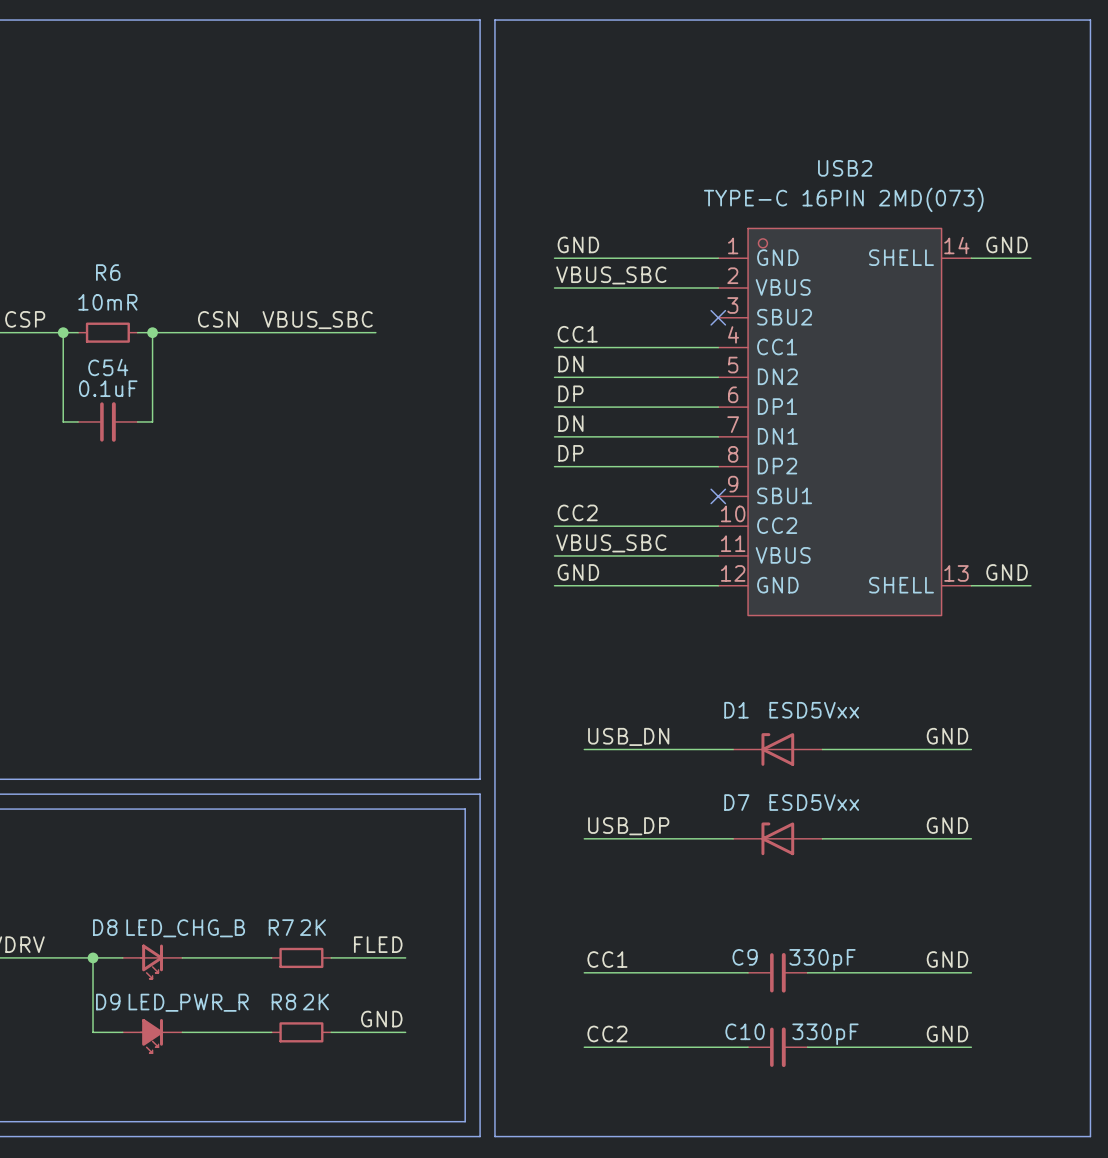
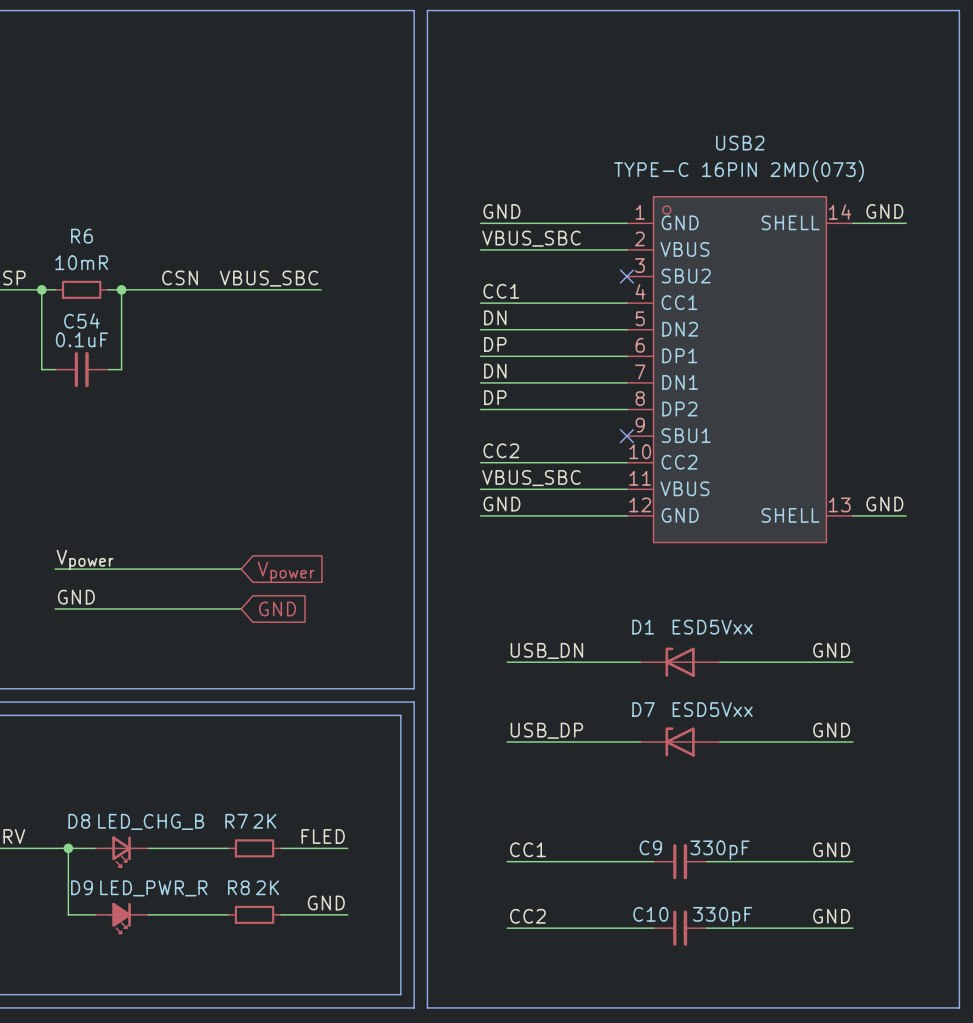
label: none -> Vpower (85, 560)
wire: none -> (55, 569) (241, 569)
global label: none -> Vpower (286, 571)
label: none -> GND (76, 597)
wire: none -> (55, 608) (241, 608)
global label: none -> GND (277, 608)

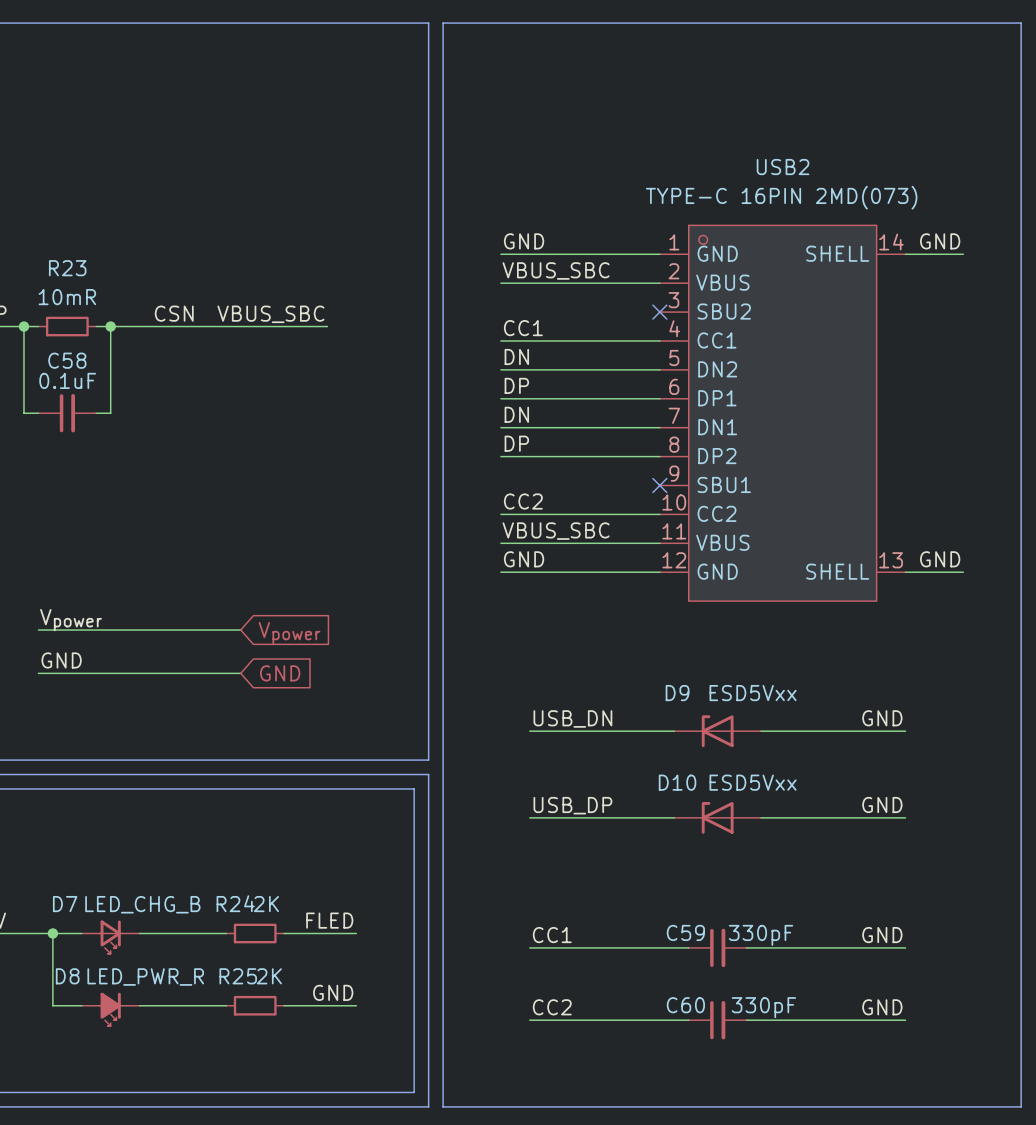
R6 name: R6 (81, 236) -> R23 (67, 268)
C54 name: C54 (81, 320) -> C58 (67, 360)
D1 name: D1 (643, 627) -> D9 (677, 693)
D7 name: D7 (643, 709) -> D10 (677, 782)
D8 name: D8 (79, 821) -> D7 (65, 904)
R7 name: R7 (236, 821) -> R24 (235, 903)
C9 name: C9 (650, 847) -> C59 (685, 932)
D9 name: D9 (81, 887) -> D8 (67, 976)
R8 name: R8 (238, 887) -> R25 (238, 976)
C10 name: C10 (650, 914) -> C60 (685, 1005)

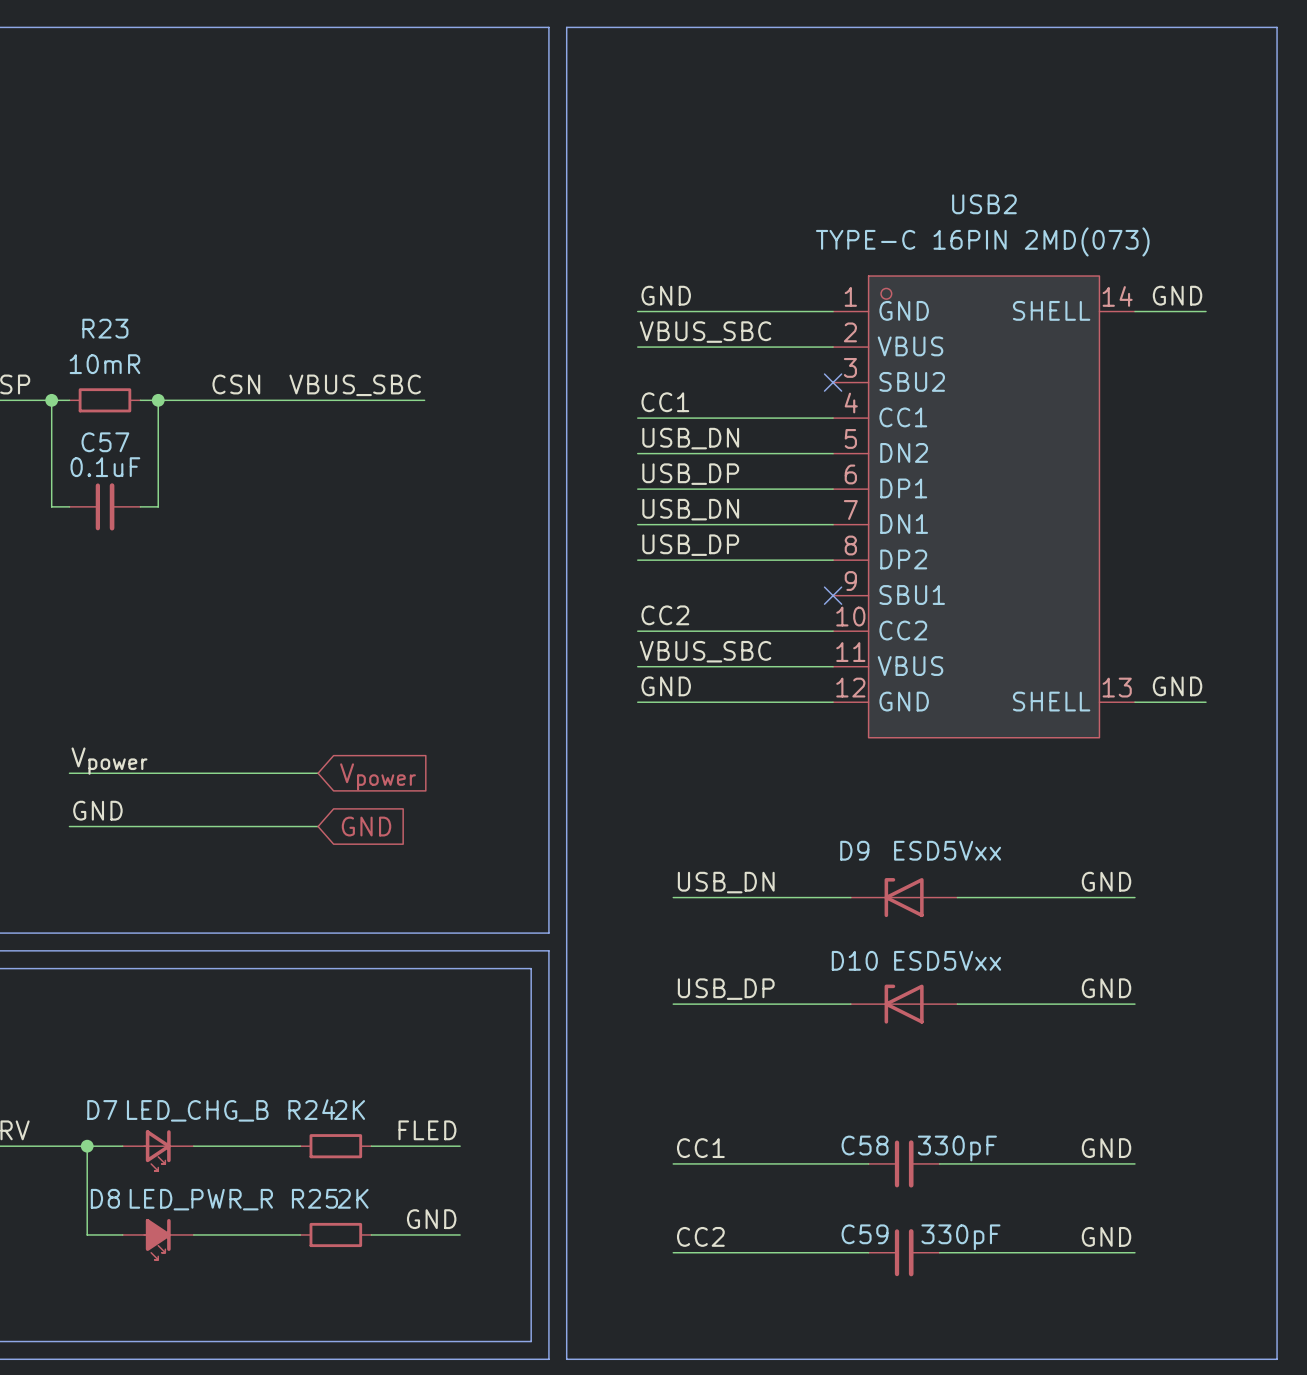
label: DN (516, 356) -> USB_DN (690, 438)
C58 name: C58 (67, 360) -> C57 (105, 442)
label: DP (516, 385) -> USB_DP (690, 474)
label: DN (516, 414) -> USB_DN (690, 509)
label: DP (516, 443) -> USB_DP (690, 545)
C59 name: C59 (685, 932) -> C58 (865, 1145)
C60 name: C60 (685, 1005) -> C59 (865, 1234)

